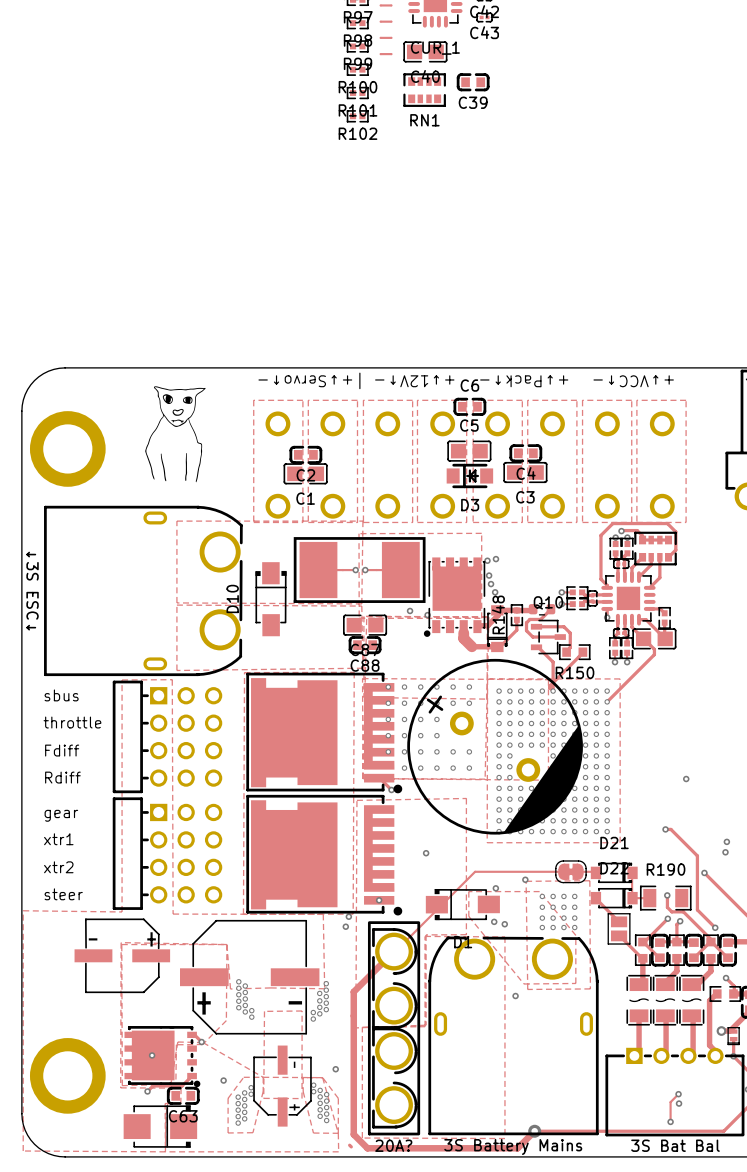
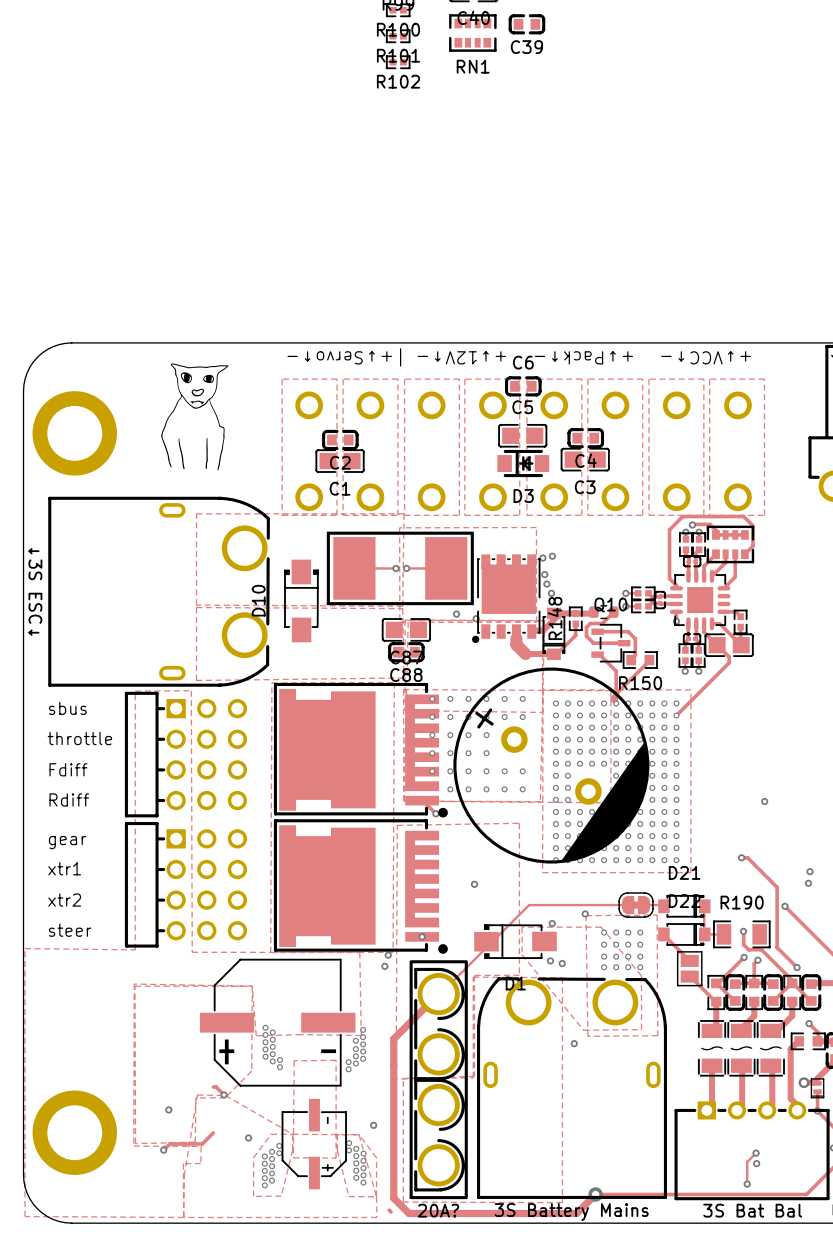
part: (122, 955) -> none
part: (162, 1056) -> none
C63: (183, 1095) -> none
part: (160, 1126) -> none

